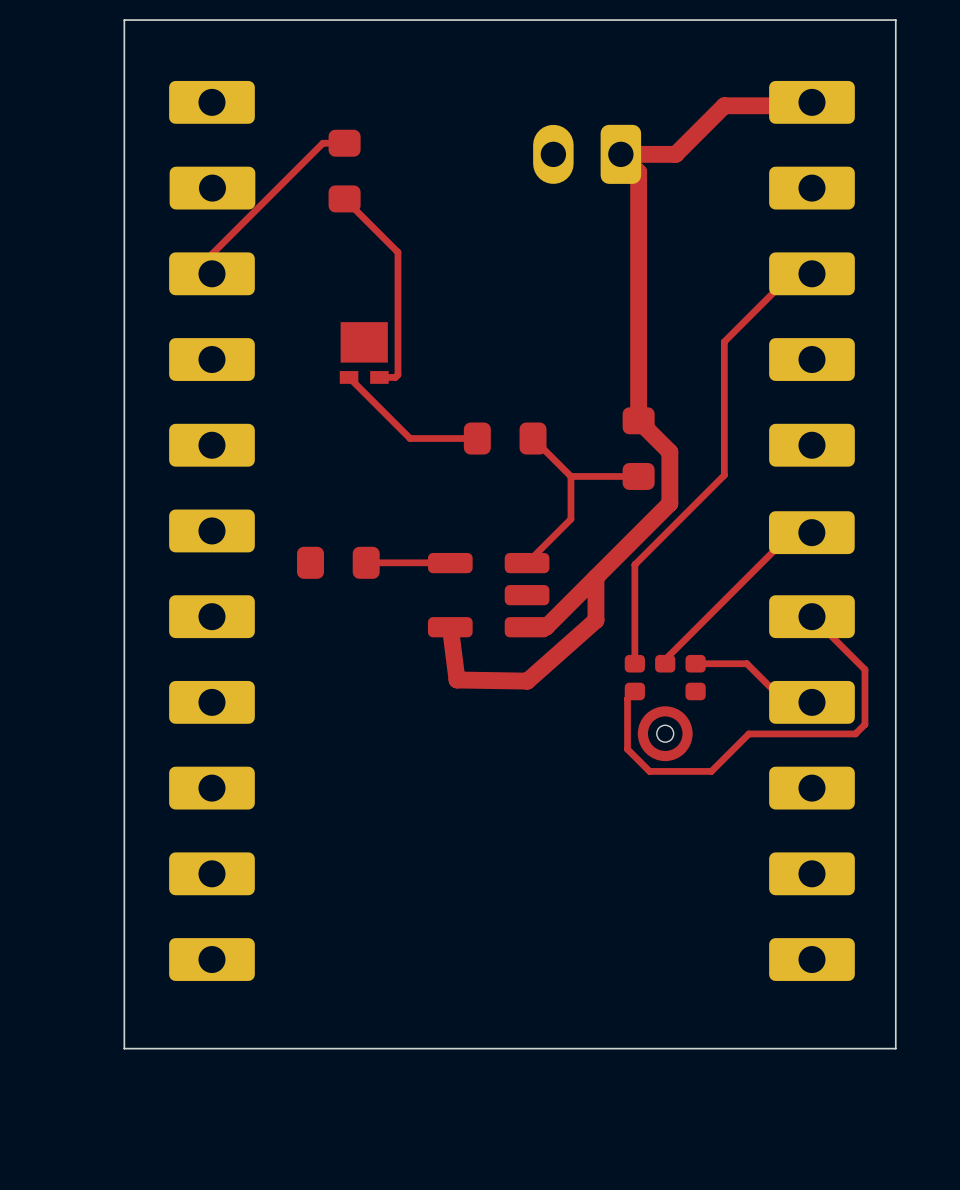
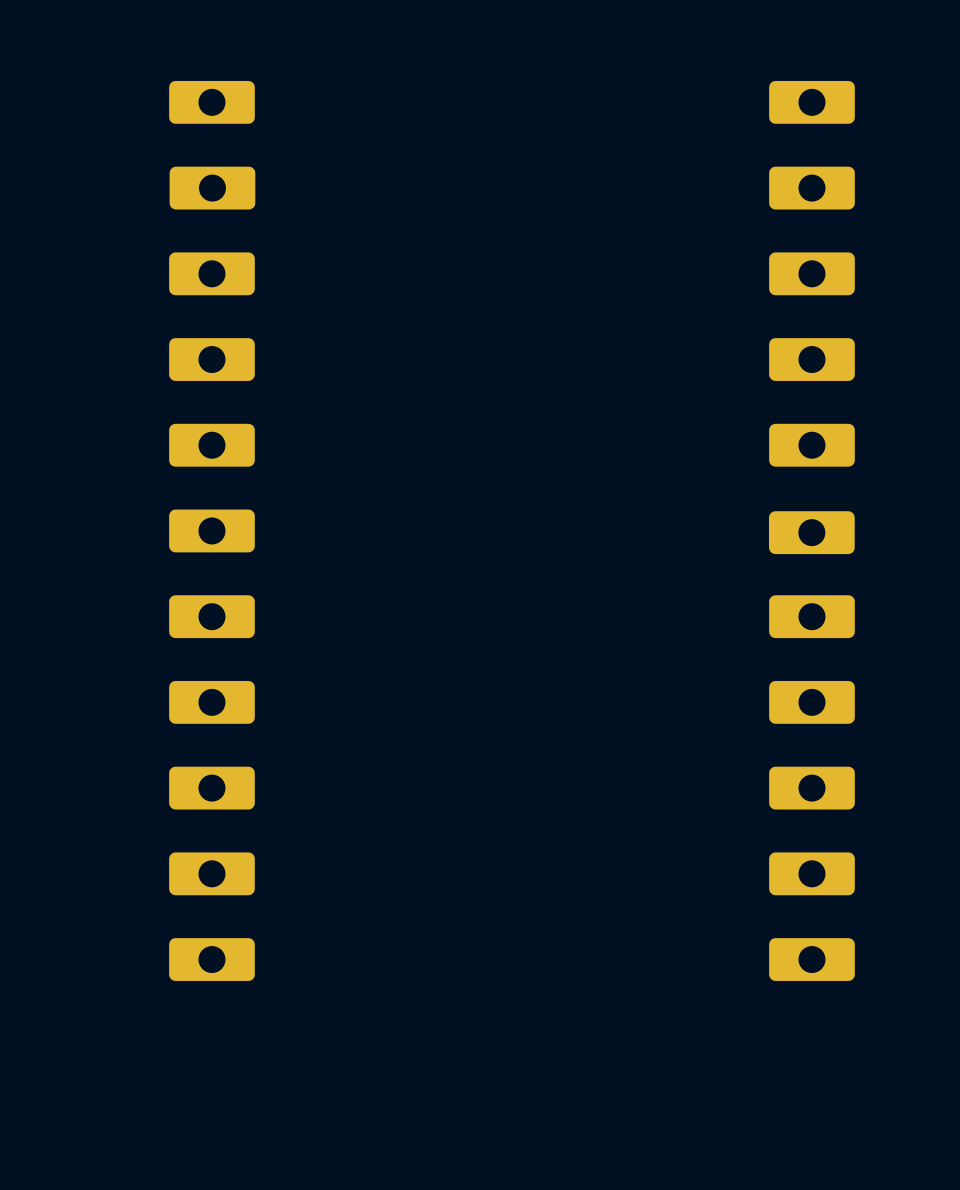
board edge: (895, 20) (124, 20) (124, 1048) (895, 1048) (895, 20) -> none
top track: (811, 102) (808, 105) (724, 105) (675, 154) (620, 154) -> none
top track: (344, 143) (322, 143) (211, 254) (211, 273) -> none
part: (587, 154) -> none
top track: (620, 154) (638, 172) (638, 420) (669, 452) (669, 503) (546, 627) (527, 627) -> none
part: (344, 171) -> none
top track: (344, 198) (397, 252) (397, 374) (395, 377) (379, 377) -> none
top track: (811, 273) (792, 273) (724, 341) (724, 475) (634, 564) (634, 663) -> none
part: (364, 352) -> none
top track: (349, 377) (410, 438) (477, 438) -> none
part: (505, 438) -> none
top track: (533, 438) (570, 476) -> none
part: (638, 448) -> none
top track: (570, 476) (570, 519) (527, 563) -> none
top track: (638, 476) (570, 476) -> none
top track: (811, 532) (792, 532) (665, 659) (665, 663) -> none
part: (338, 562) -> none
top track: (450, 562) (366, 562) -> none
top track: (595, 577) (595, 620) (527, 681) (457, 679) (450, 627) -> none
part: (488, 595) -> none
top track: (811, 616) (864, 669) (864, 724) (855, 733) (748, 733) (711, 771) (649, 771) (627, 749) (627, 698) (634, 691) -> none
top track: (695, 663) (746, 663) (785, 702) (811, 702) -> none
part: (665, 708) -> none

